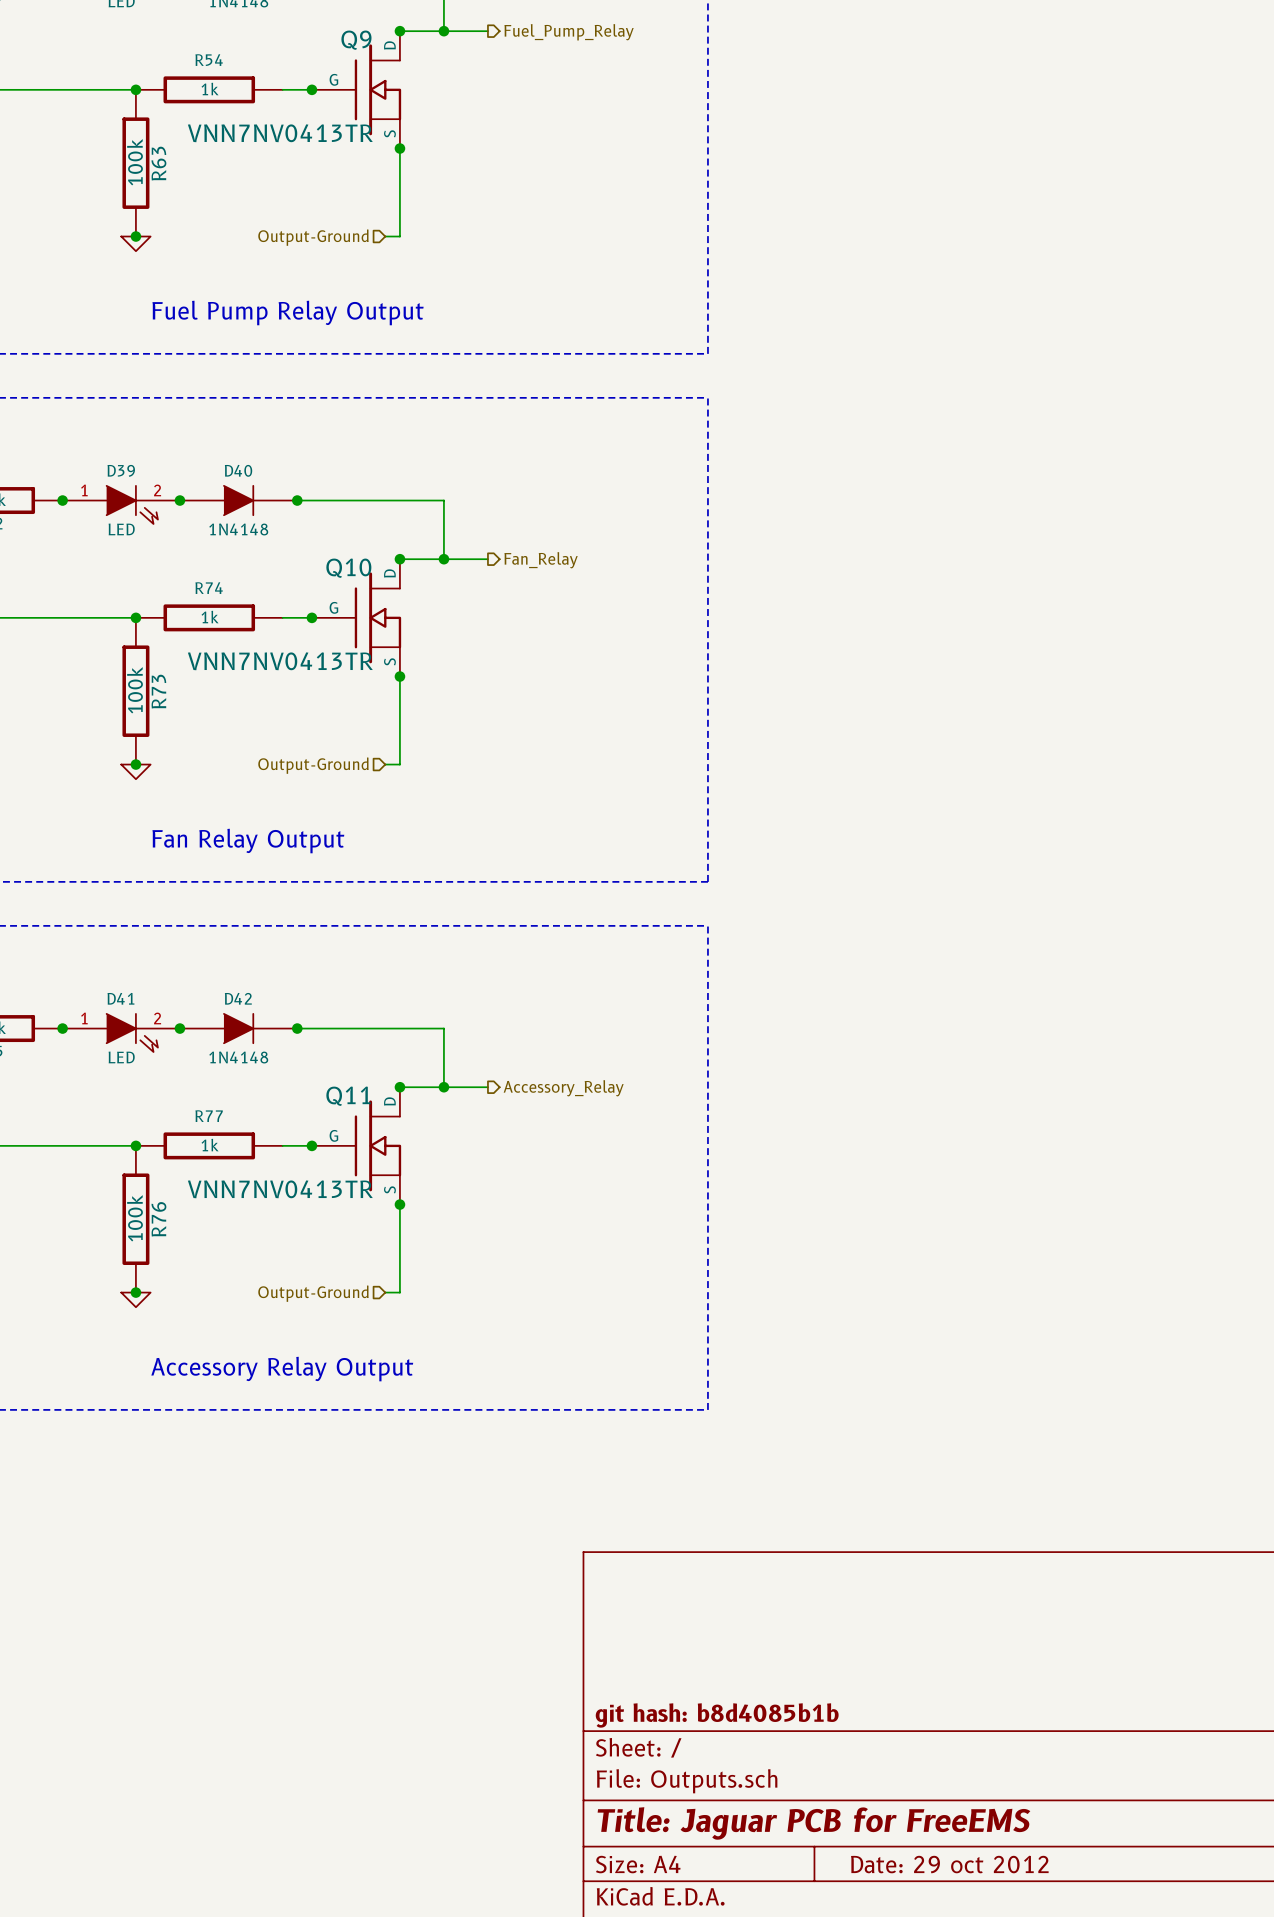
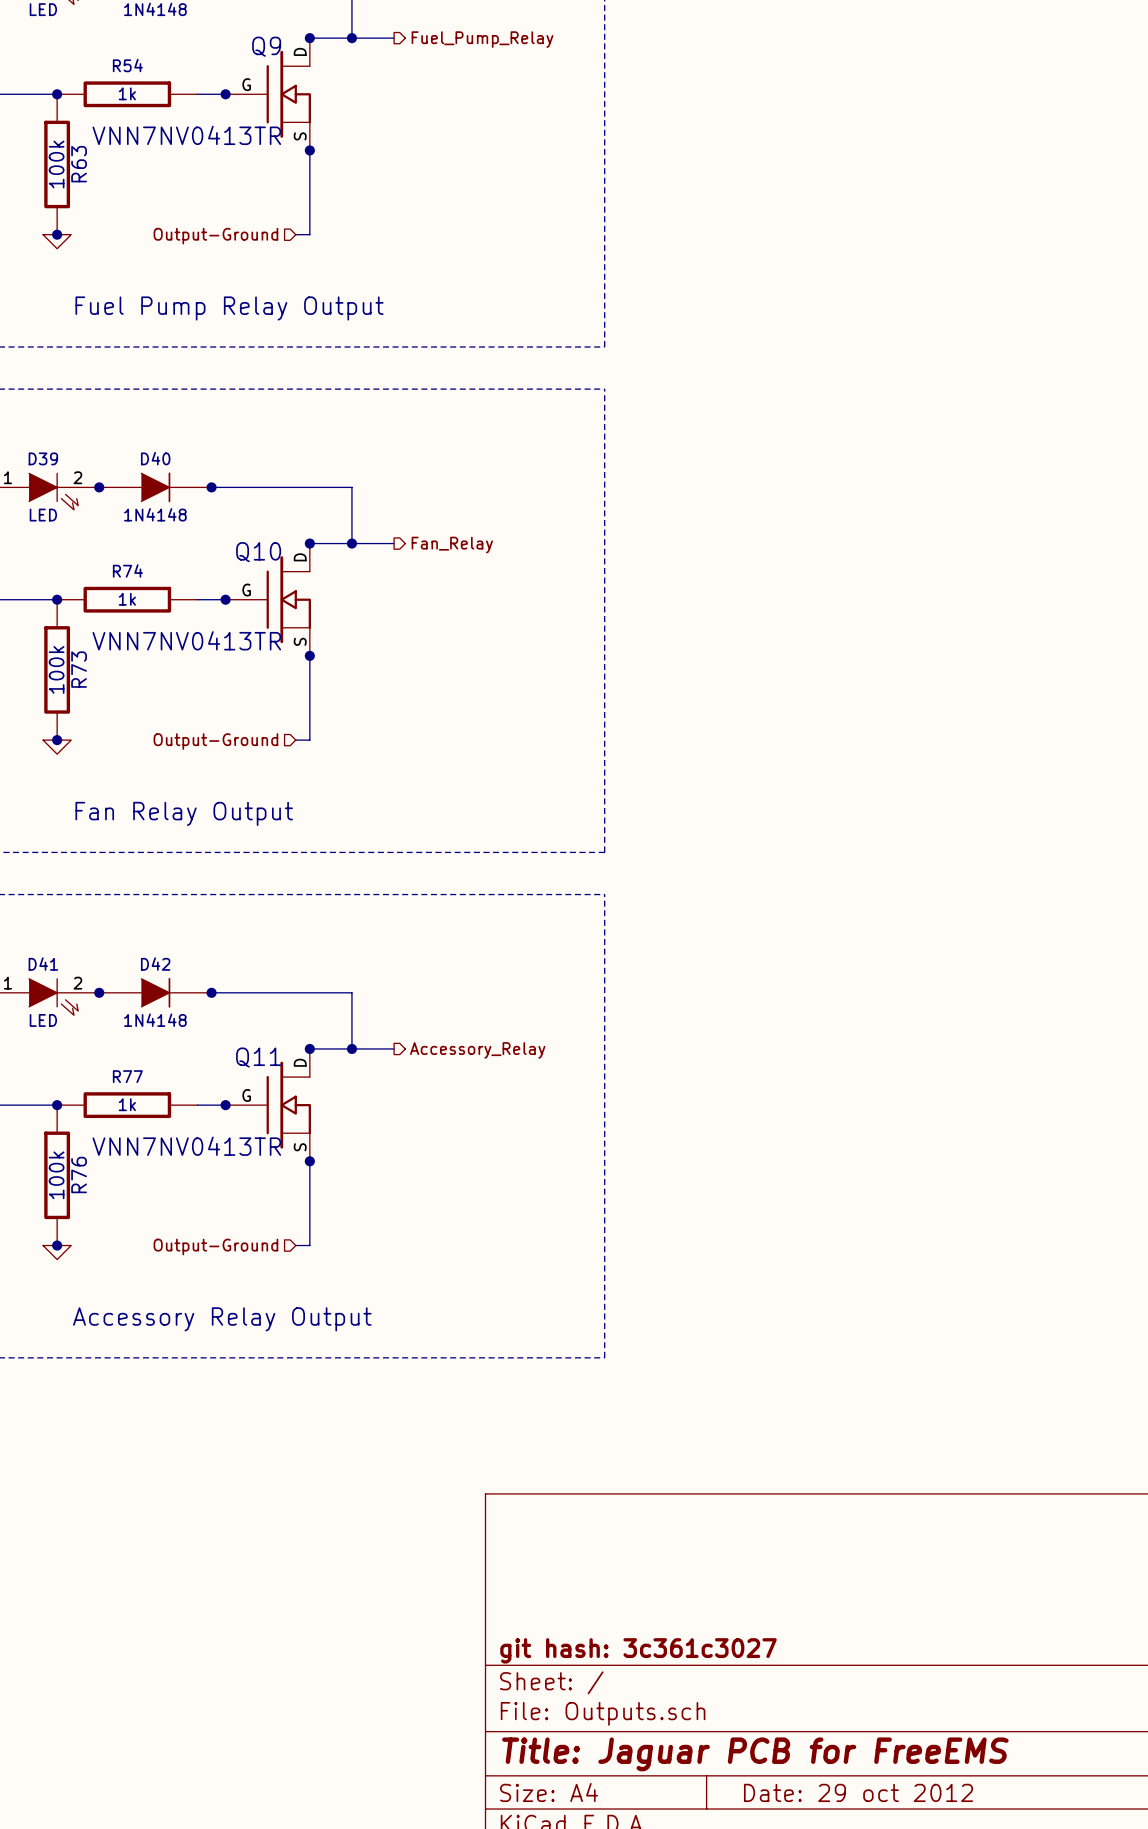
title block: git hash: b8d4085b1b (717, 1715) -> git hash: 3c361c3027 (638, 1650)

